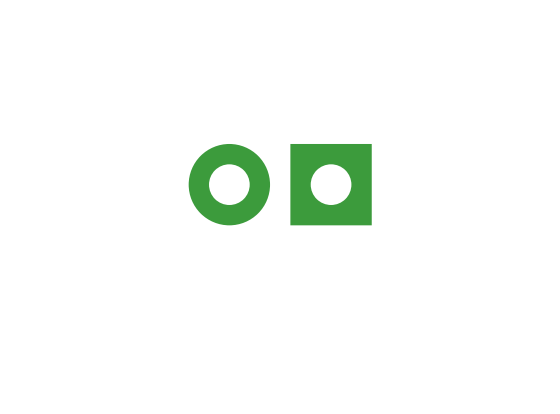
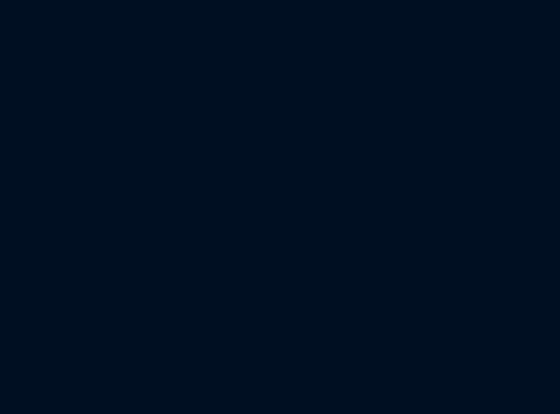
part: (280, 184) -> none

